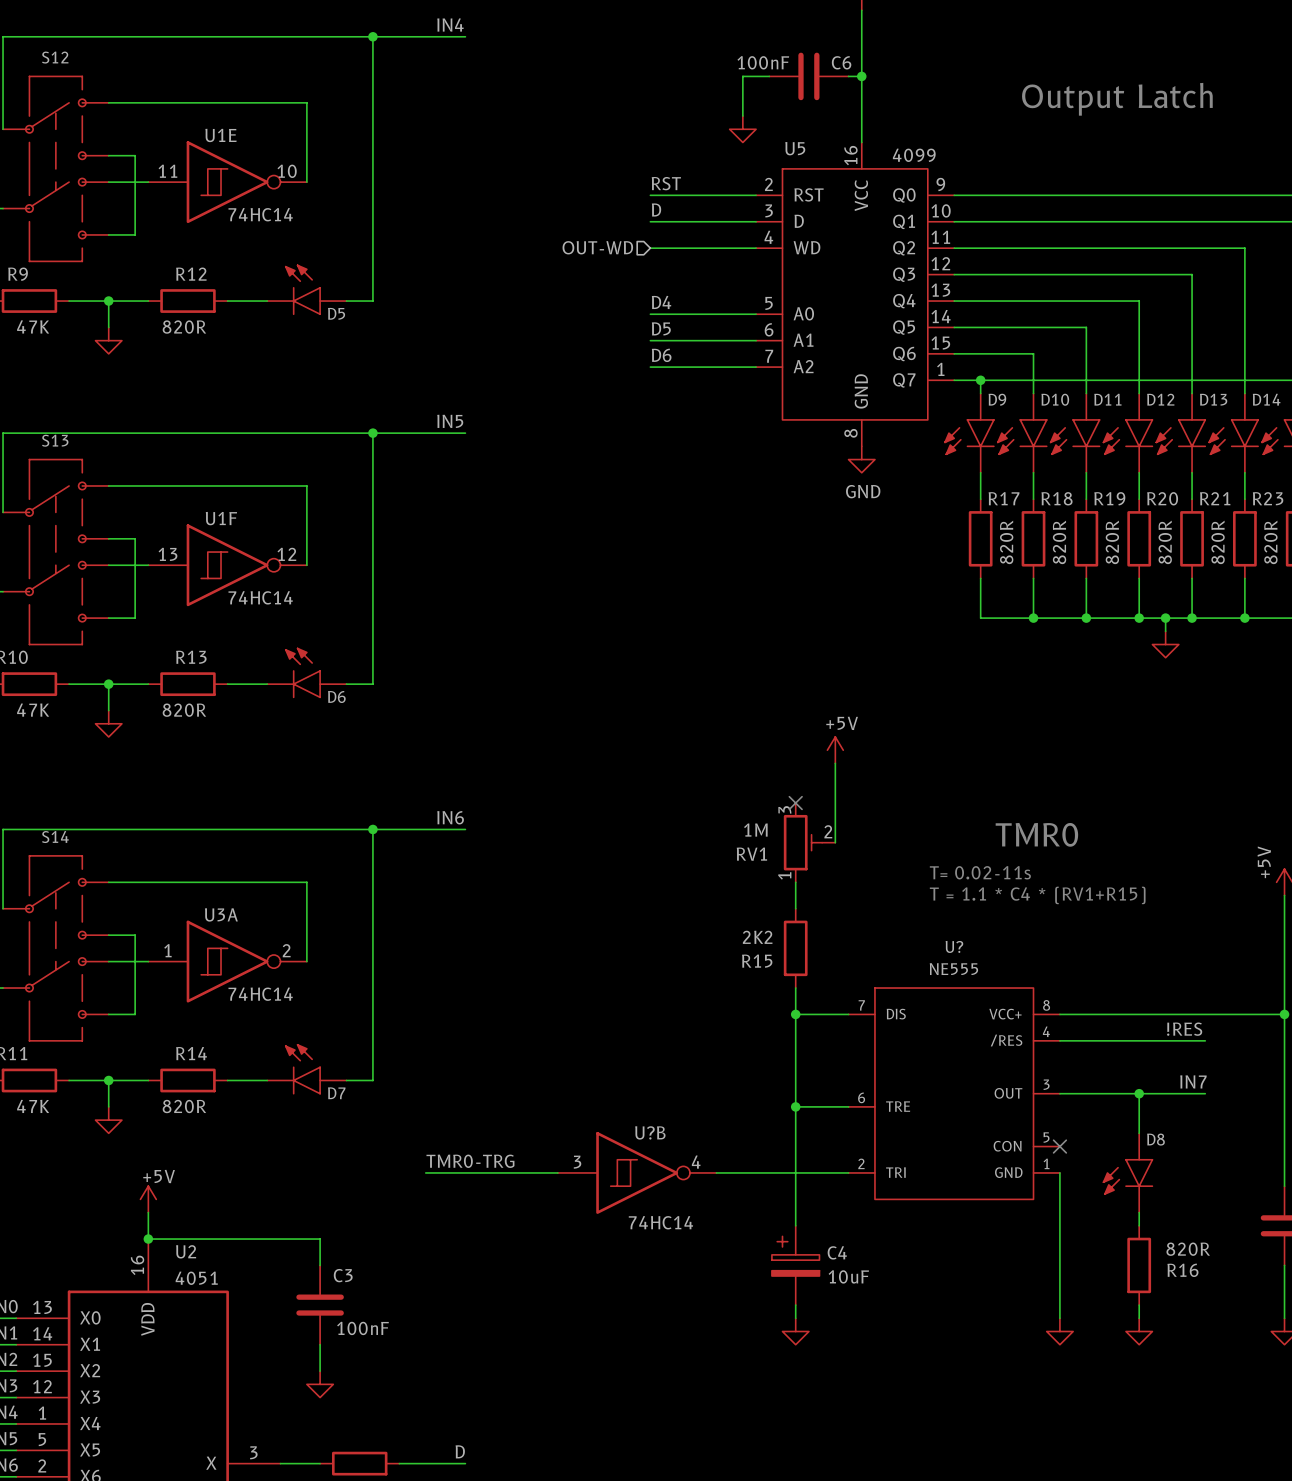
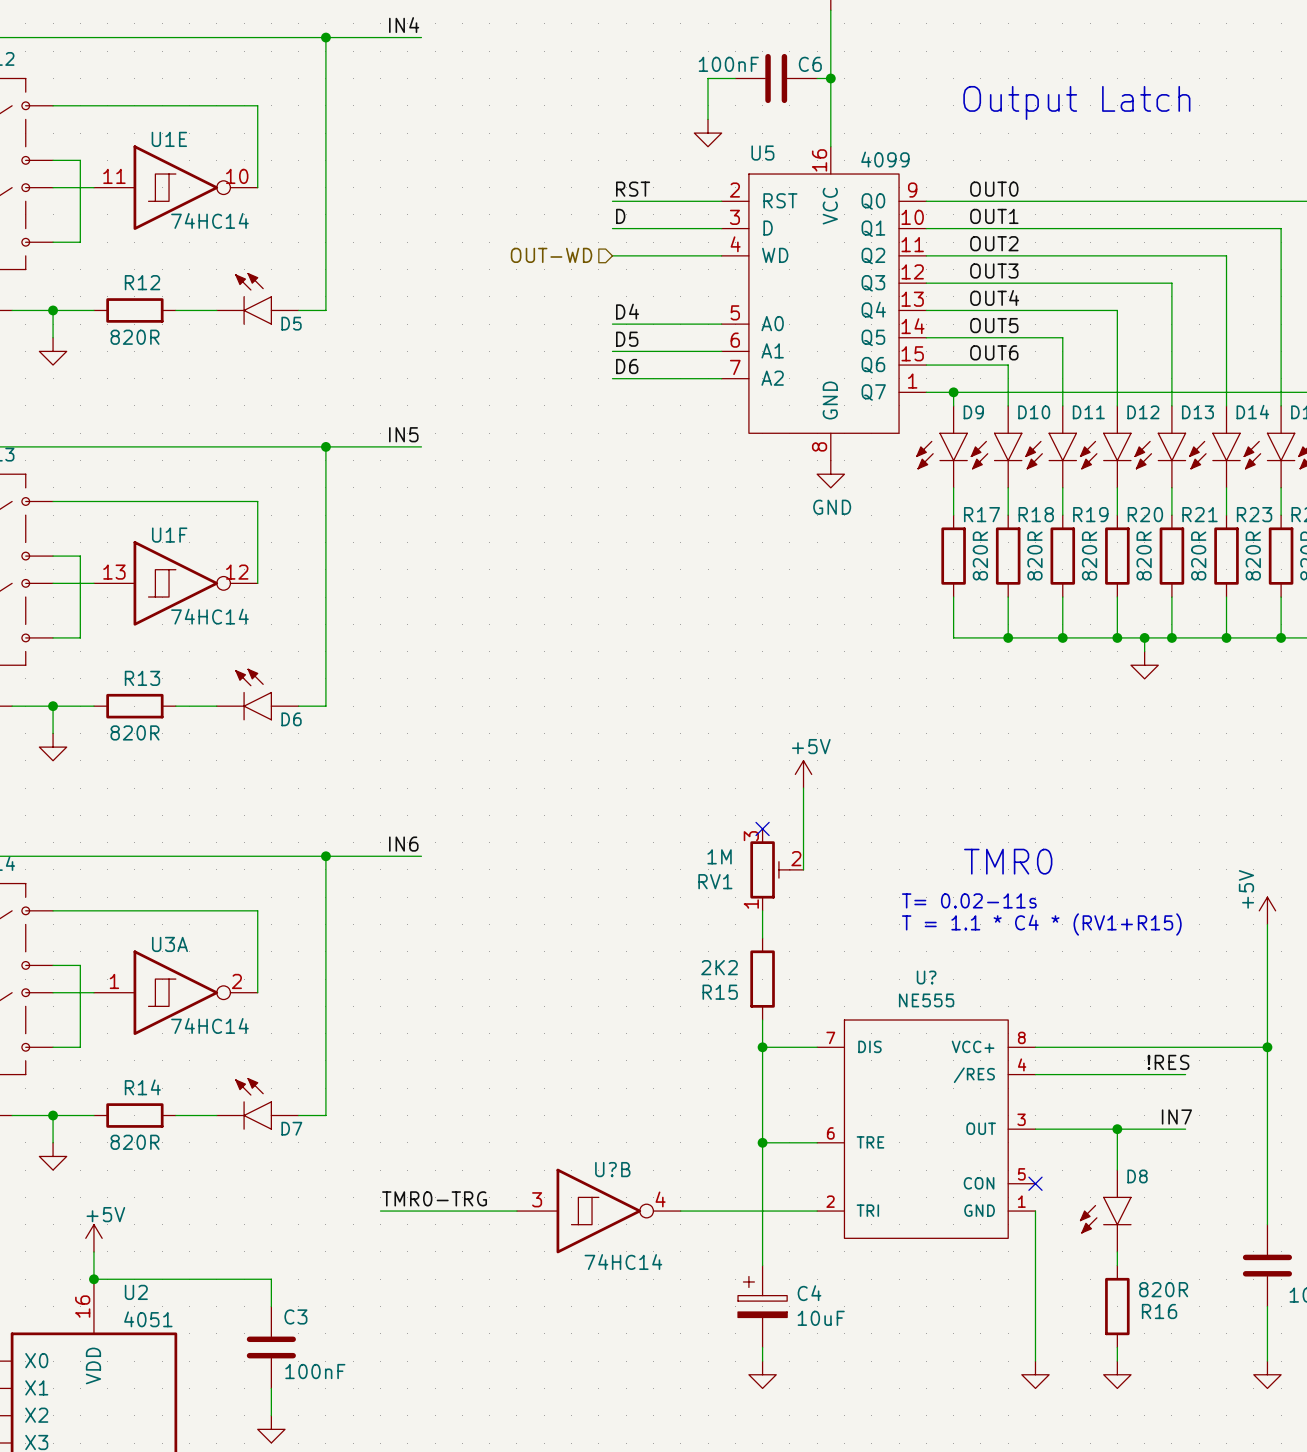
label: none -> OUT0 (994, 189)
label: none -> OUT1 (994, 216)
label: none -> OUT2 (994, 243)
label: none -> OUT3 (994, 270)
label: none -> OUT4 (994, 297)
label: none -> OUT5 (994, 325)
label: none -> OUT6 (994, 352)

